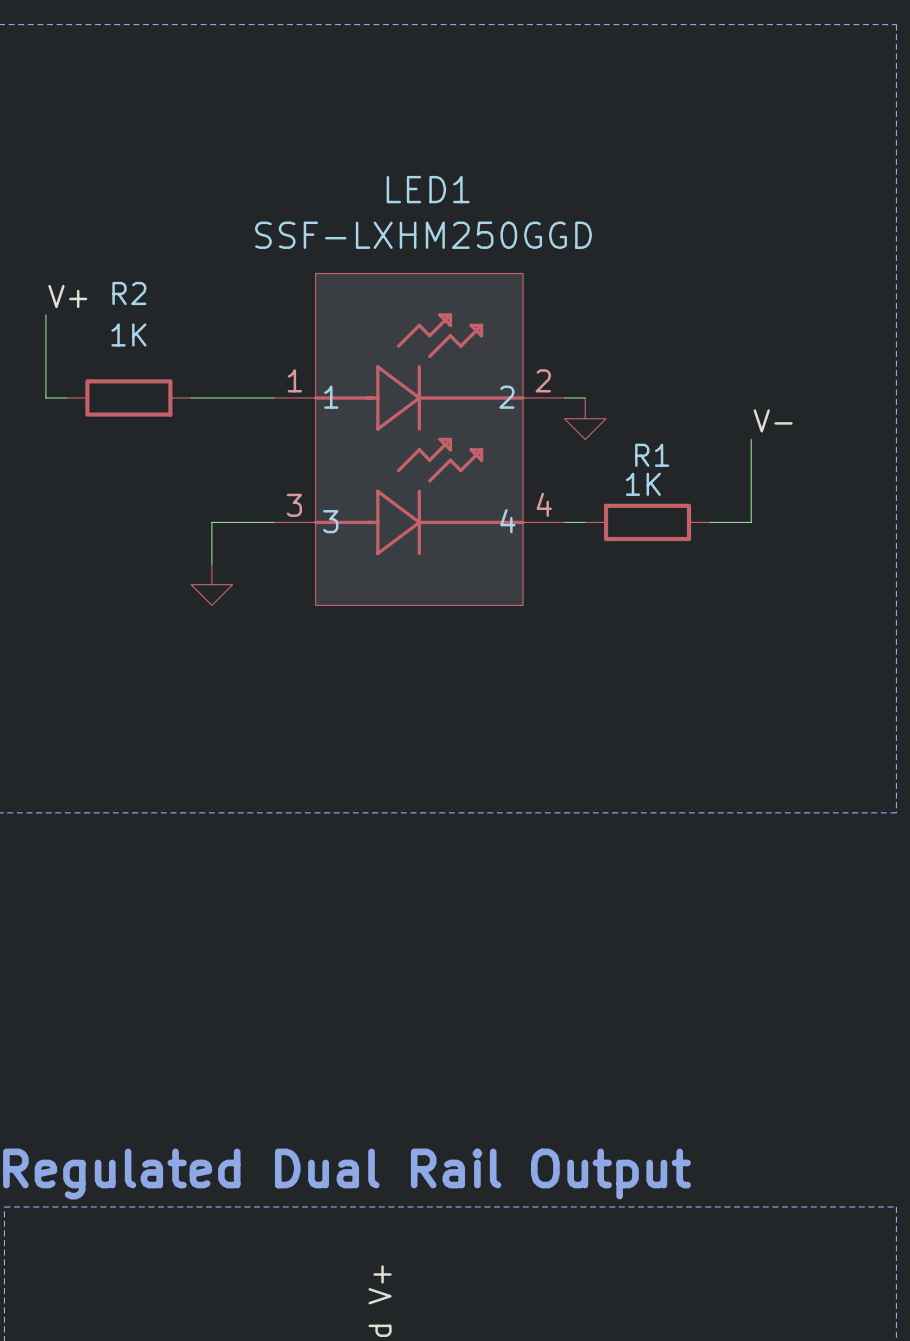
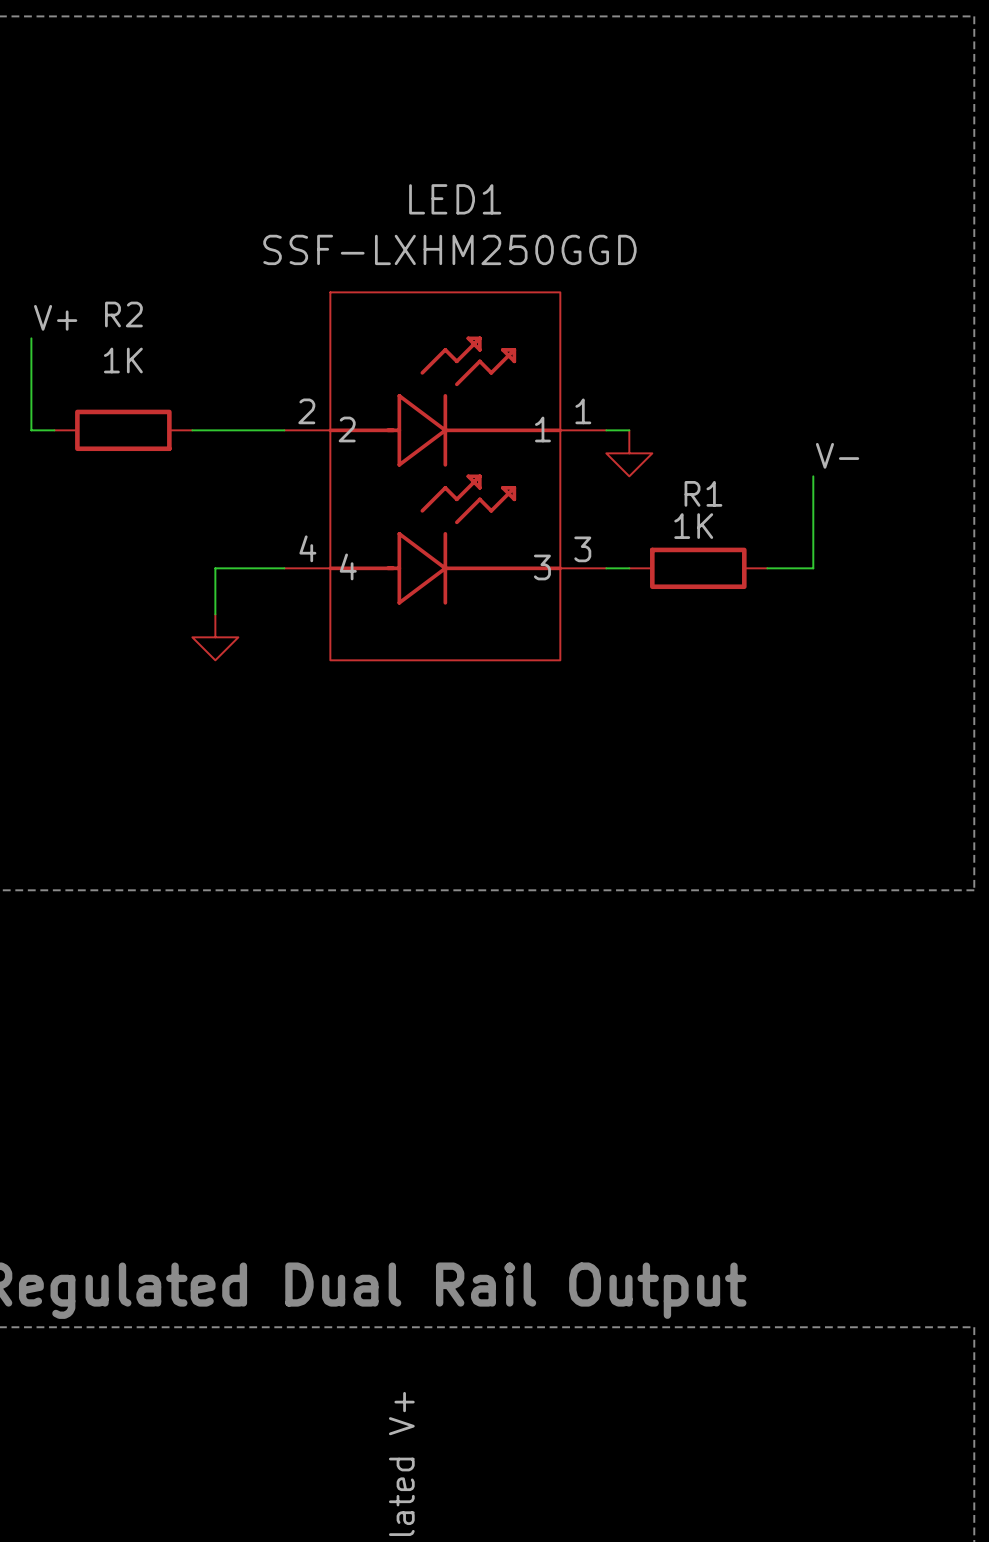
LED1 pin number: 1 (294, 380) -> 2 (306, 411)
LED1 pin number: 2 (543, 380) -> 1 (583, 411)
LED1 pin name: 1 (331, 397) -> 2 (347, 429)
LED1 pin name: 2 (506, 397) -> 1 (542, 429)
LED1 pin number: 4 (544, 504) -> 3 (582, 549)
LED1 pin number: 3 (294, 505) -> 4 (307, 548)
LED1 pin name: 3 (330, 521) -> 4 (348, 566)
LED1 pin name: 4 (507, 521) -> 3 (542, 567)

